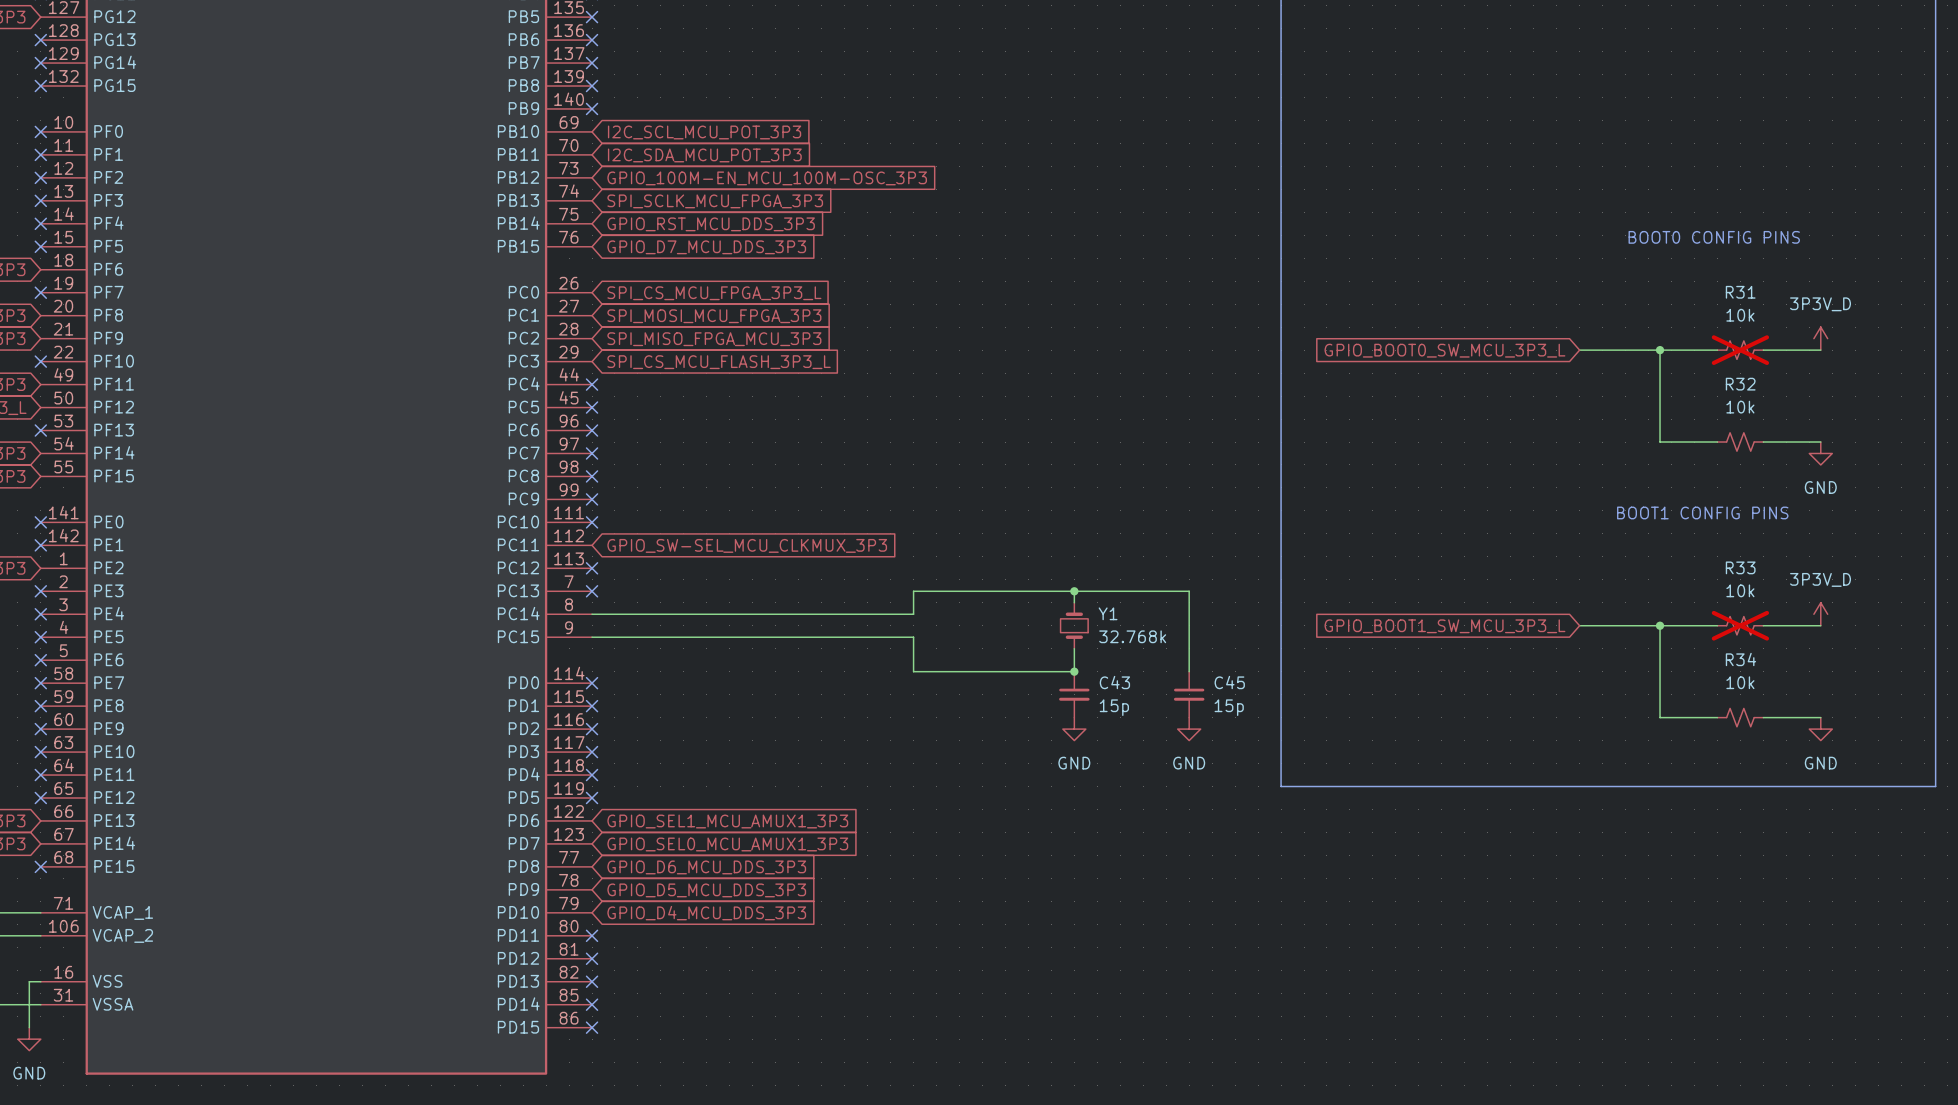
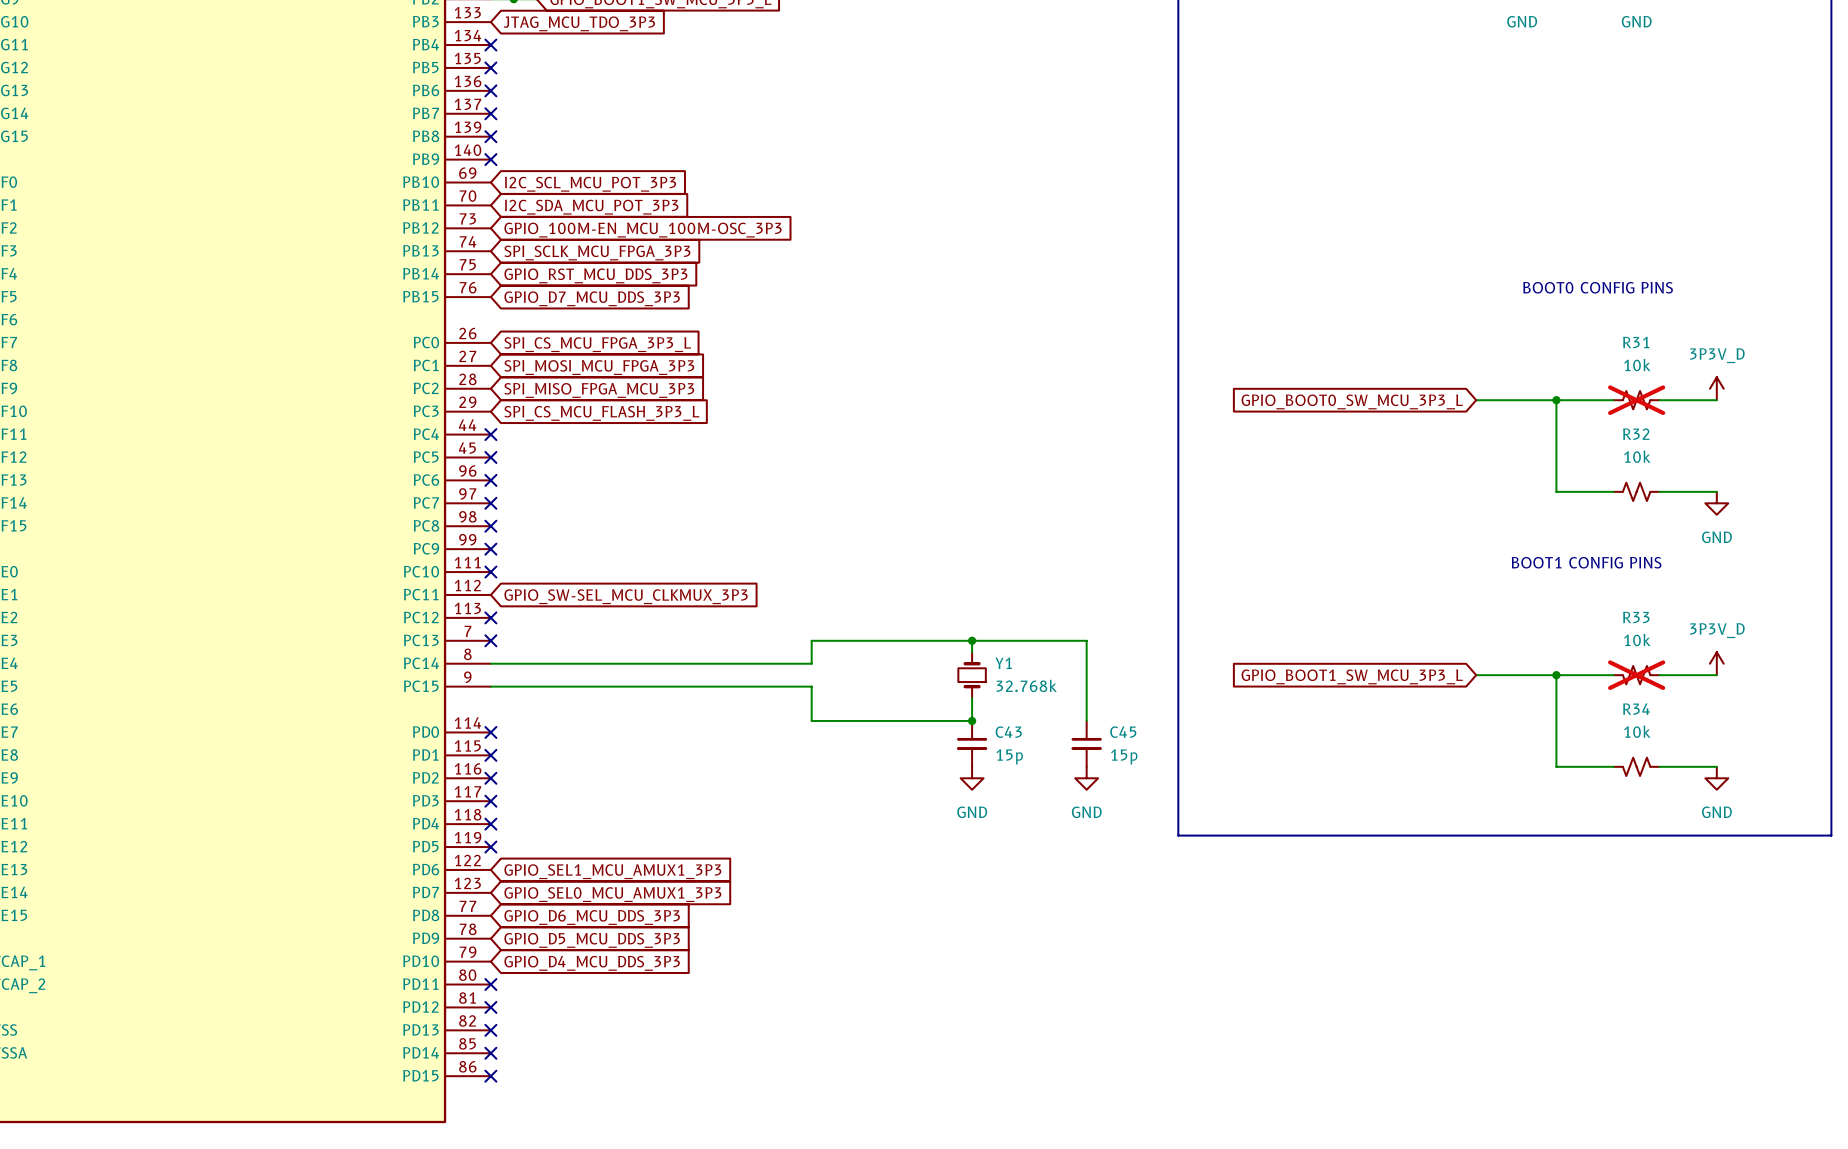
R33 flip: as is (1740, 625) -> left-right (1636, 675)
R34 flip: as is (1740, 717) -> left-right (1636, 766)

